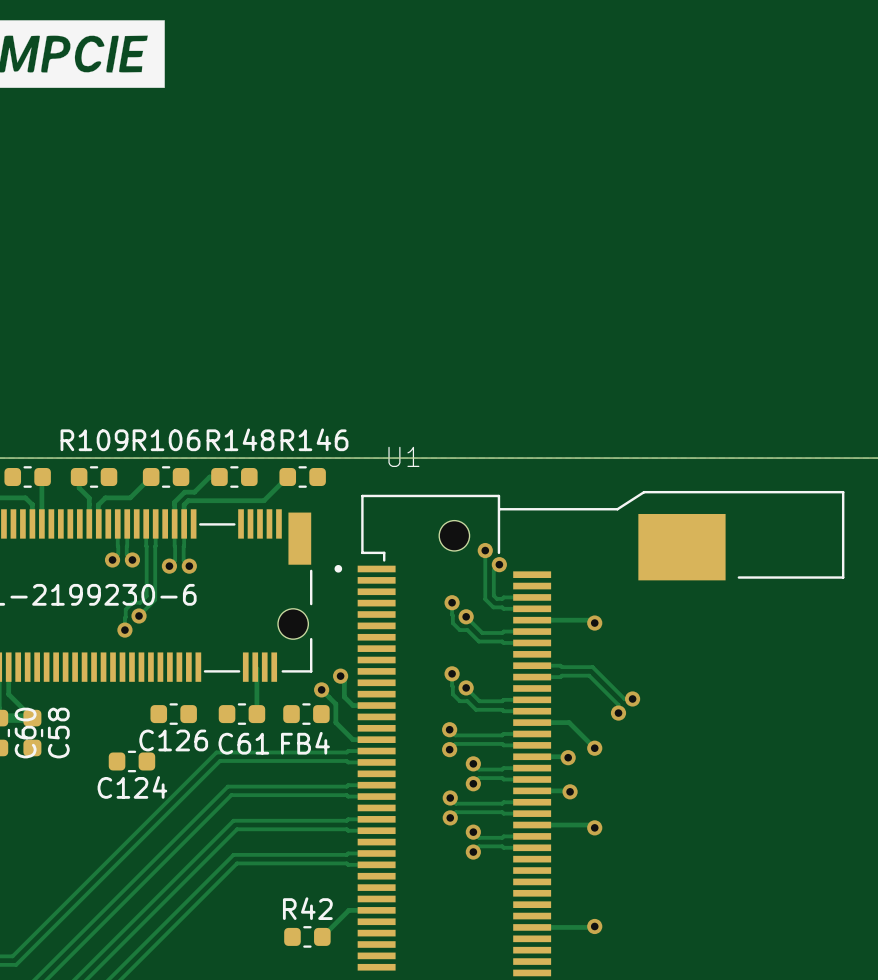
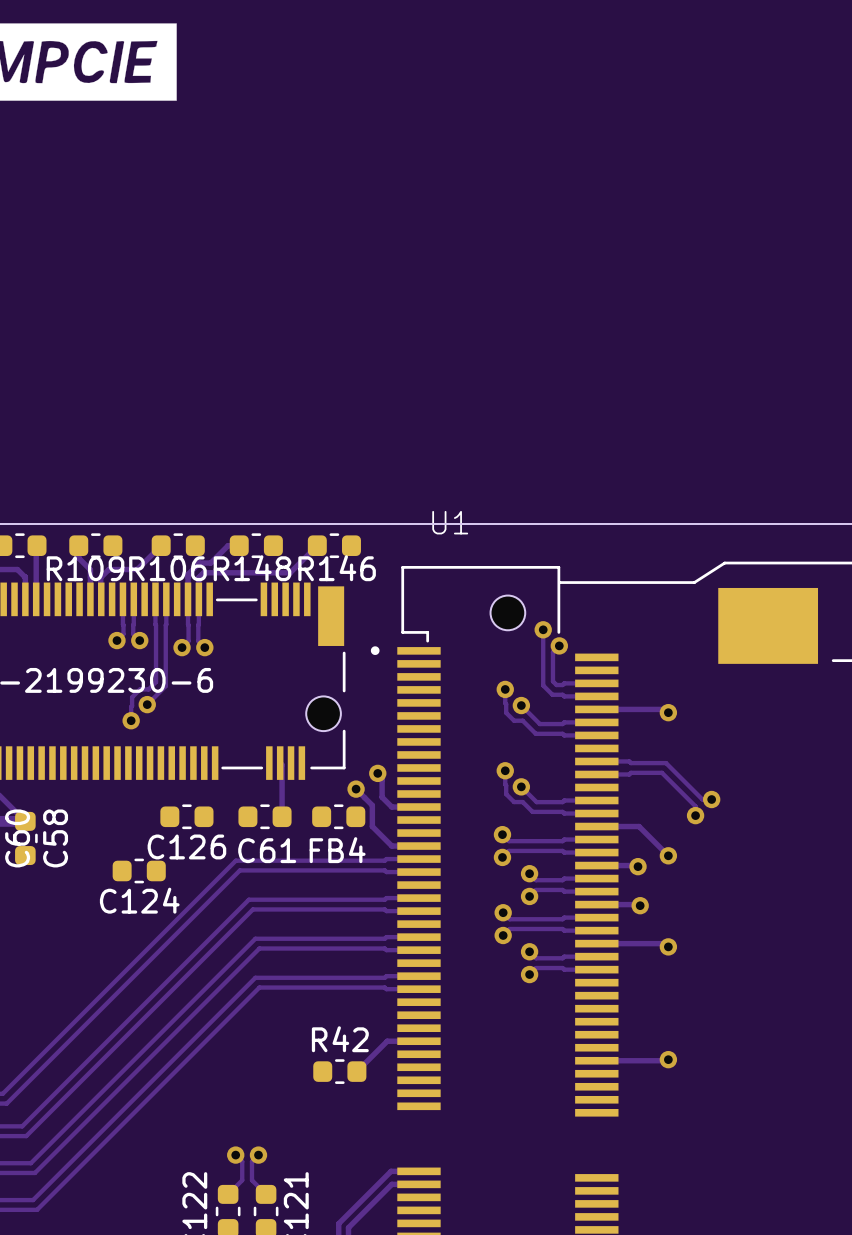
R148 name position: R148 (240, 439) -> R148 (252, 568)
R146 name position: R146 (314, 439) -> R146 (337, 568)
R109 name position: R109 (94, 440) -> R109 (85, 568)
R106 name position: R106 (166, 440) -> R106 (167, 568)

